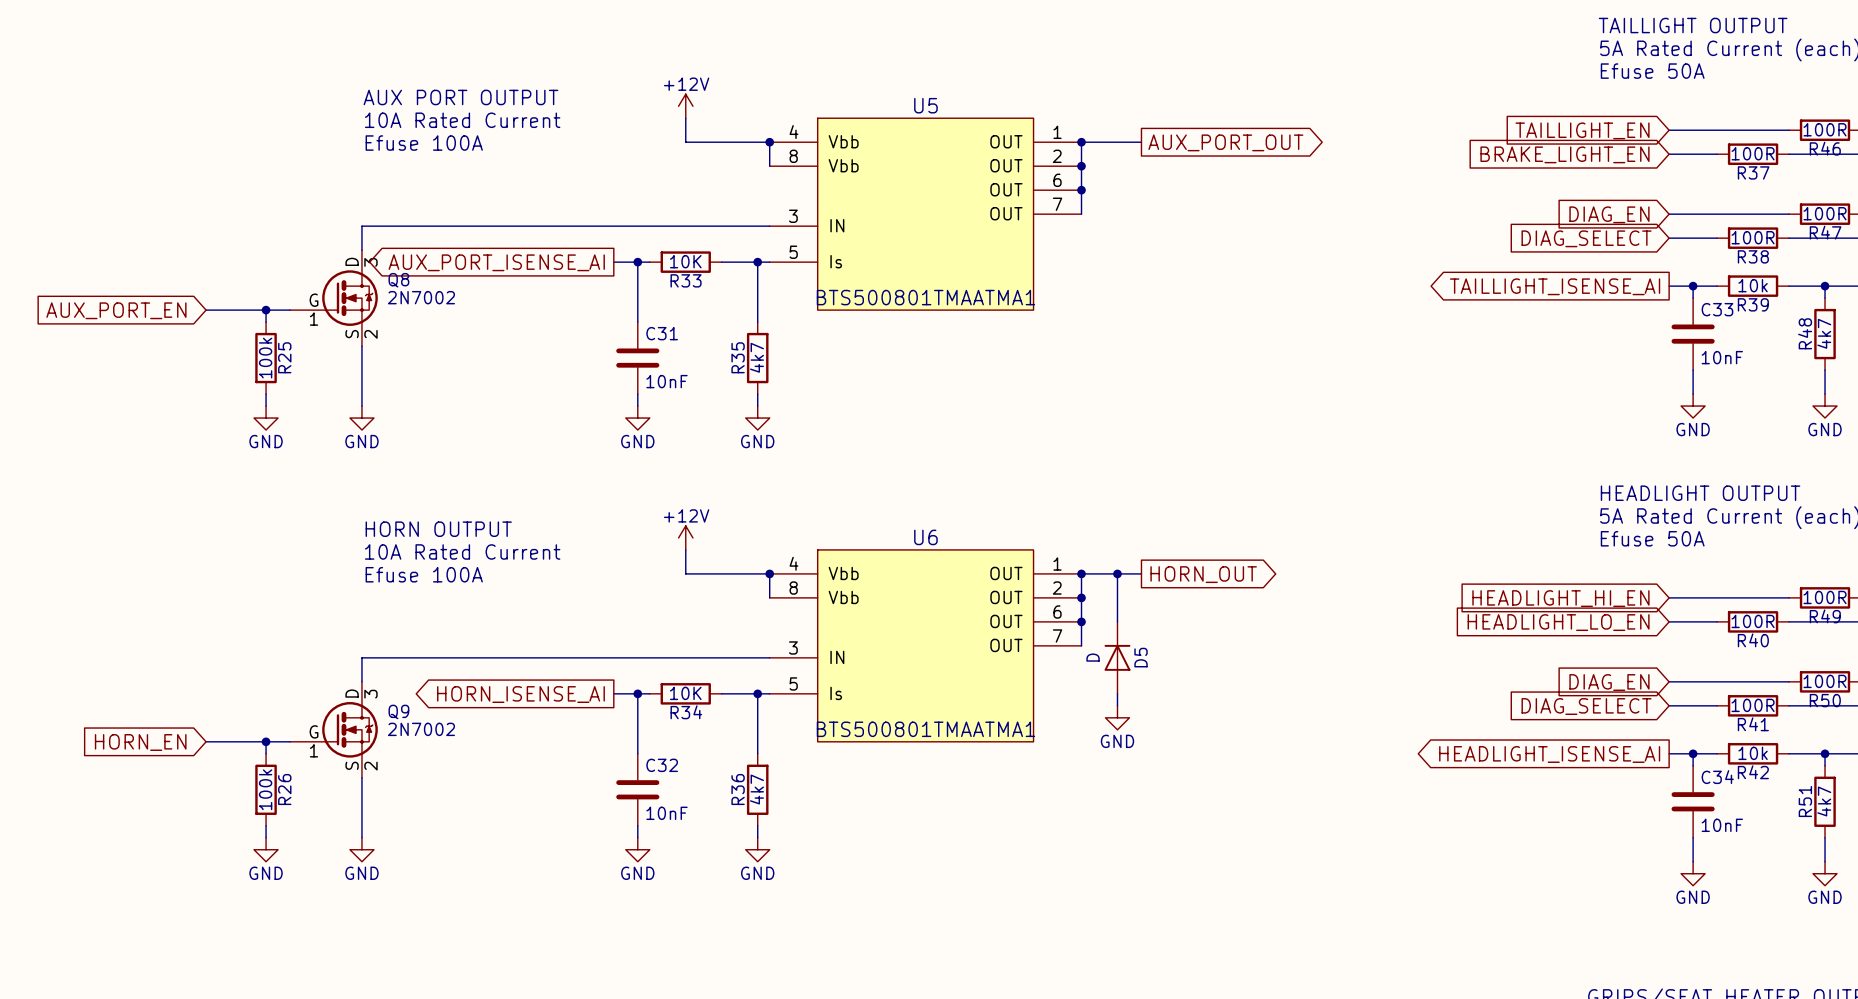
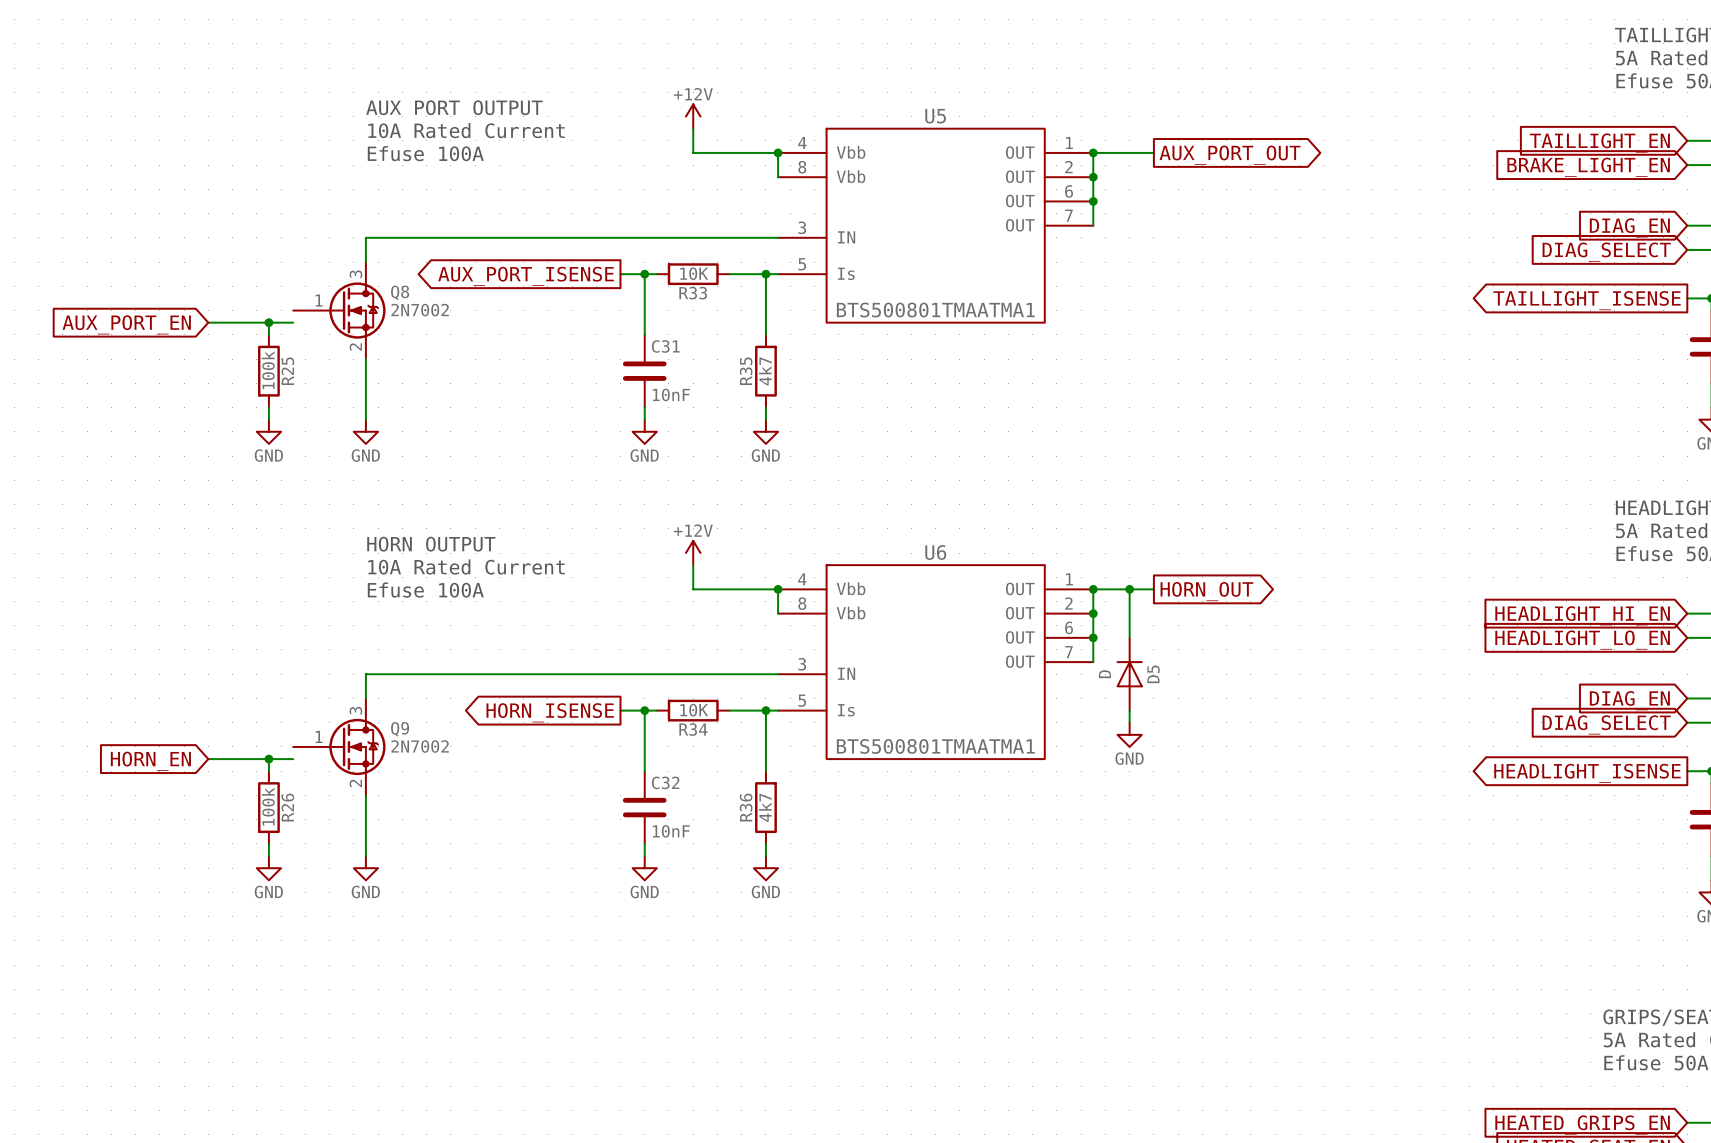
Q8 symbol: [290, 250, 378, 347] -> [293, 262, 386, 360]
global label: AUX_PORT_ISENSE_AI (496, 262) -> AUX_PORT_ISENSE (526, 276)
global label: TAILLIGHT_ISENSE_AI (1555, 286) -> TAILLIGHT_ISENSE (1587, 300)
Q9 symbol: [290, 681, 378, 778] -> [293, 698, 386, 796]
global label: HORN_ISENSE_AI (520, 694) -> HORN_ISENSE (550, 712)
global label: HEADLIGHT_ISENSE_AI (1549, 754) -> HEADLIGHT_ISENSE (1587, 773)

